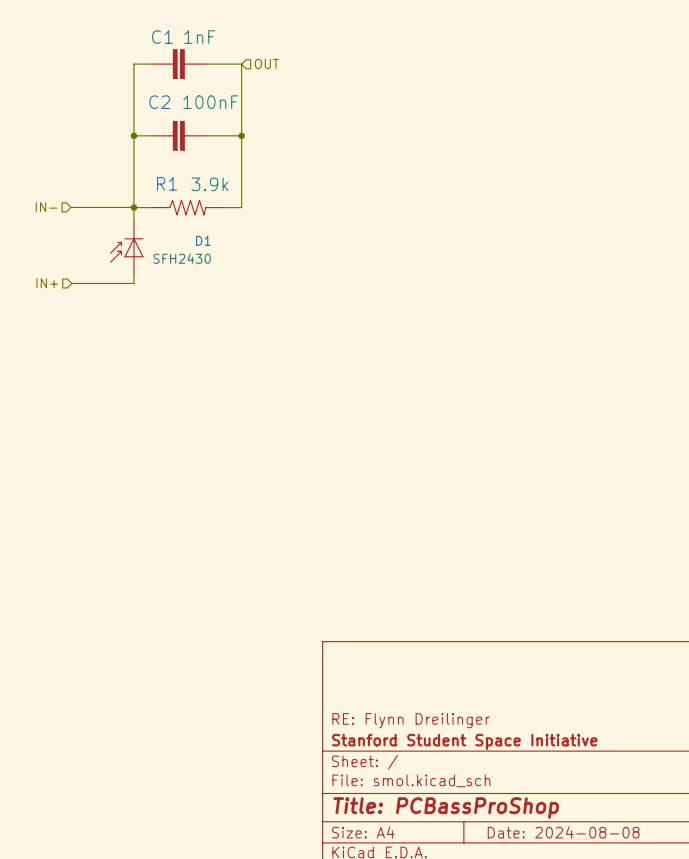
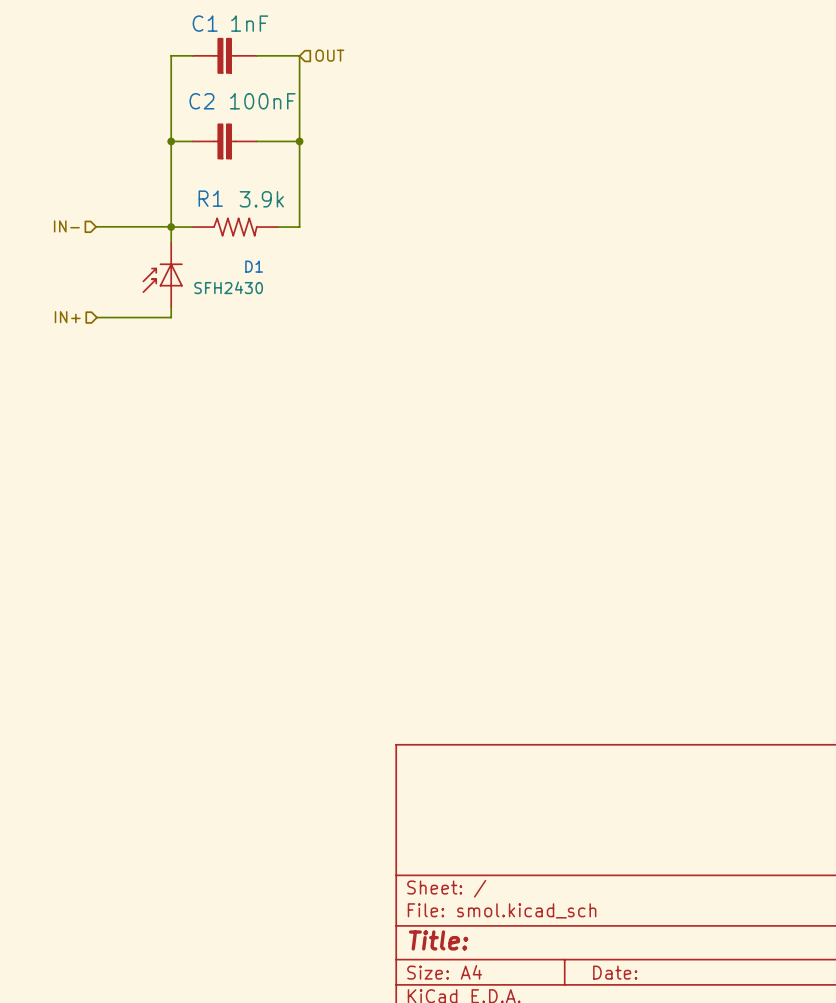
title block: RE: Flynn Dreilinger (411, 720) -> none
title block: Stanford Student Space Initiative (464, 741) -> none
title block: Title: PCBassProShop (446, 808) -> Title: (438, 940)
title block: Date: 2024-08-08 (563, 832) -> Date: (615, 972)

